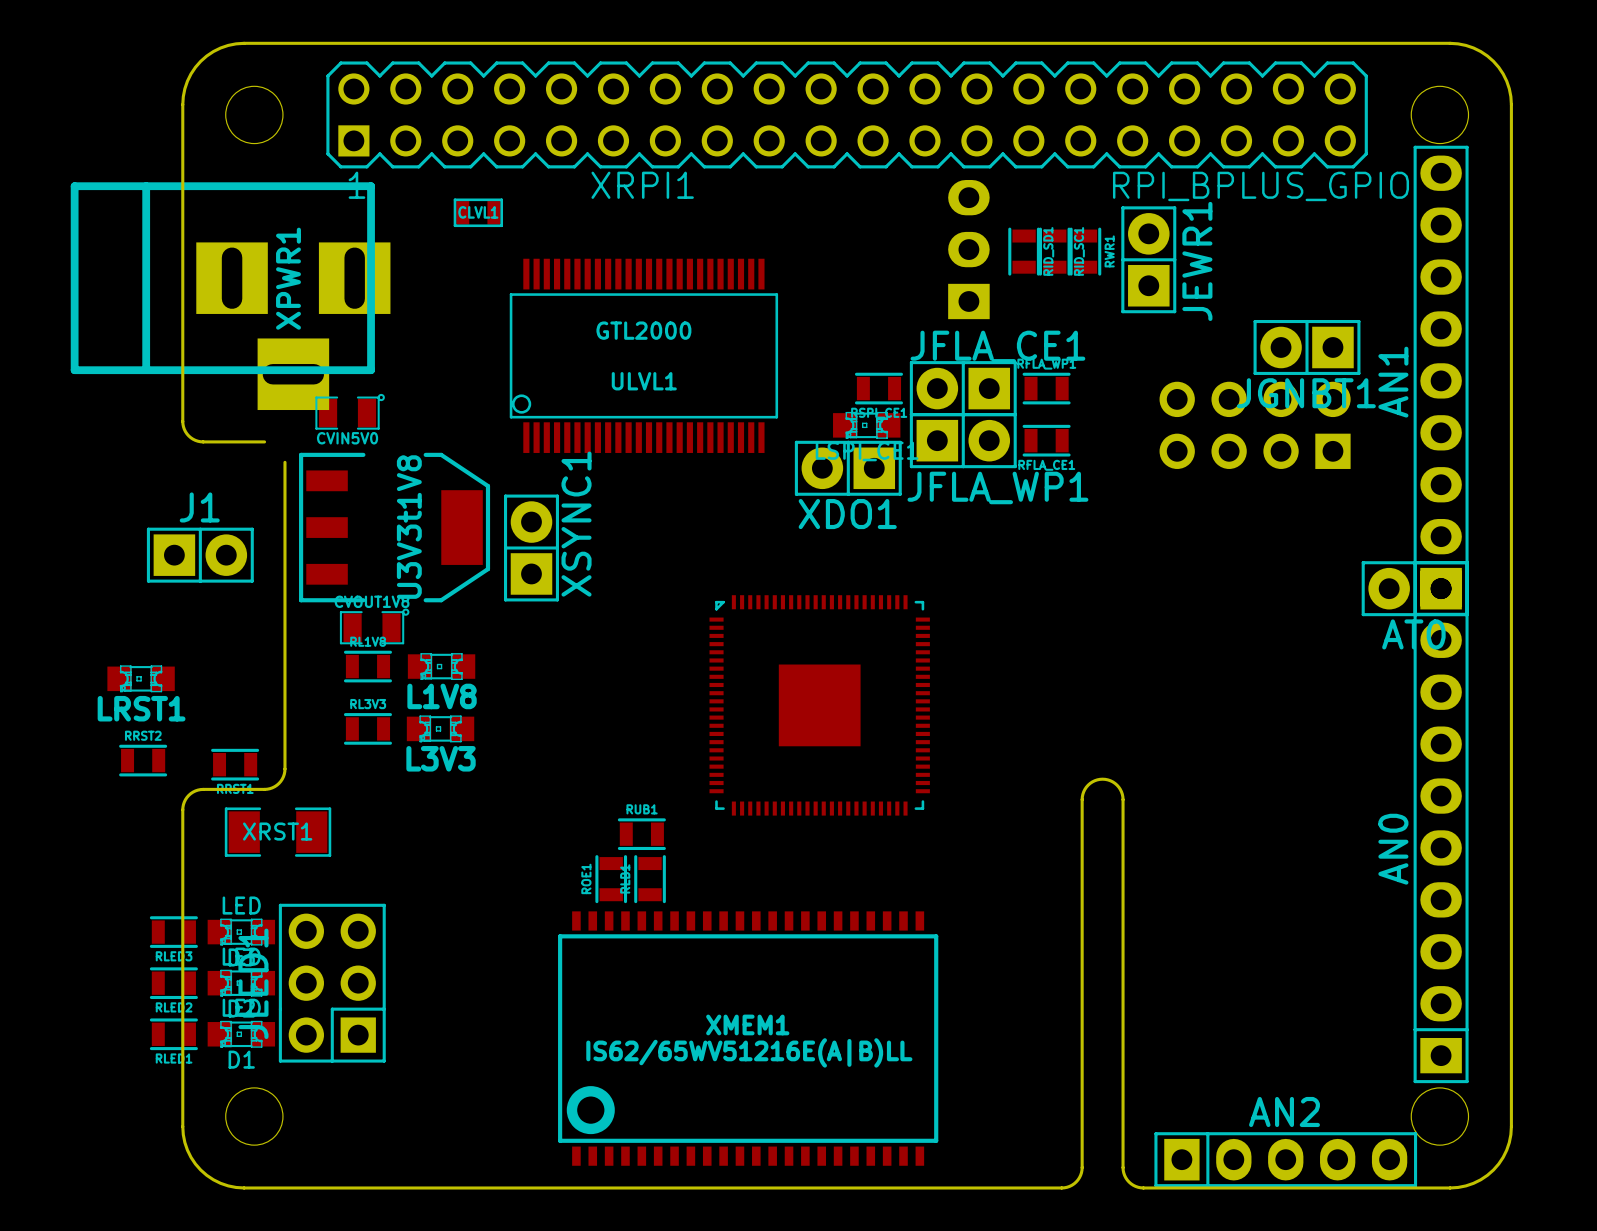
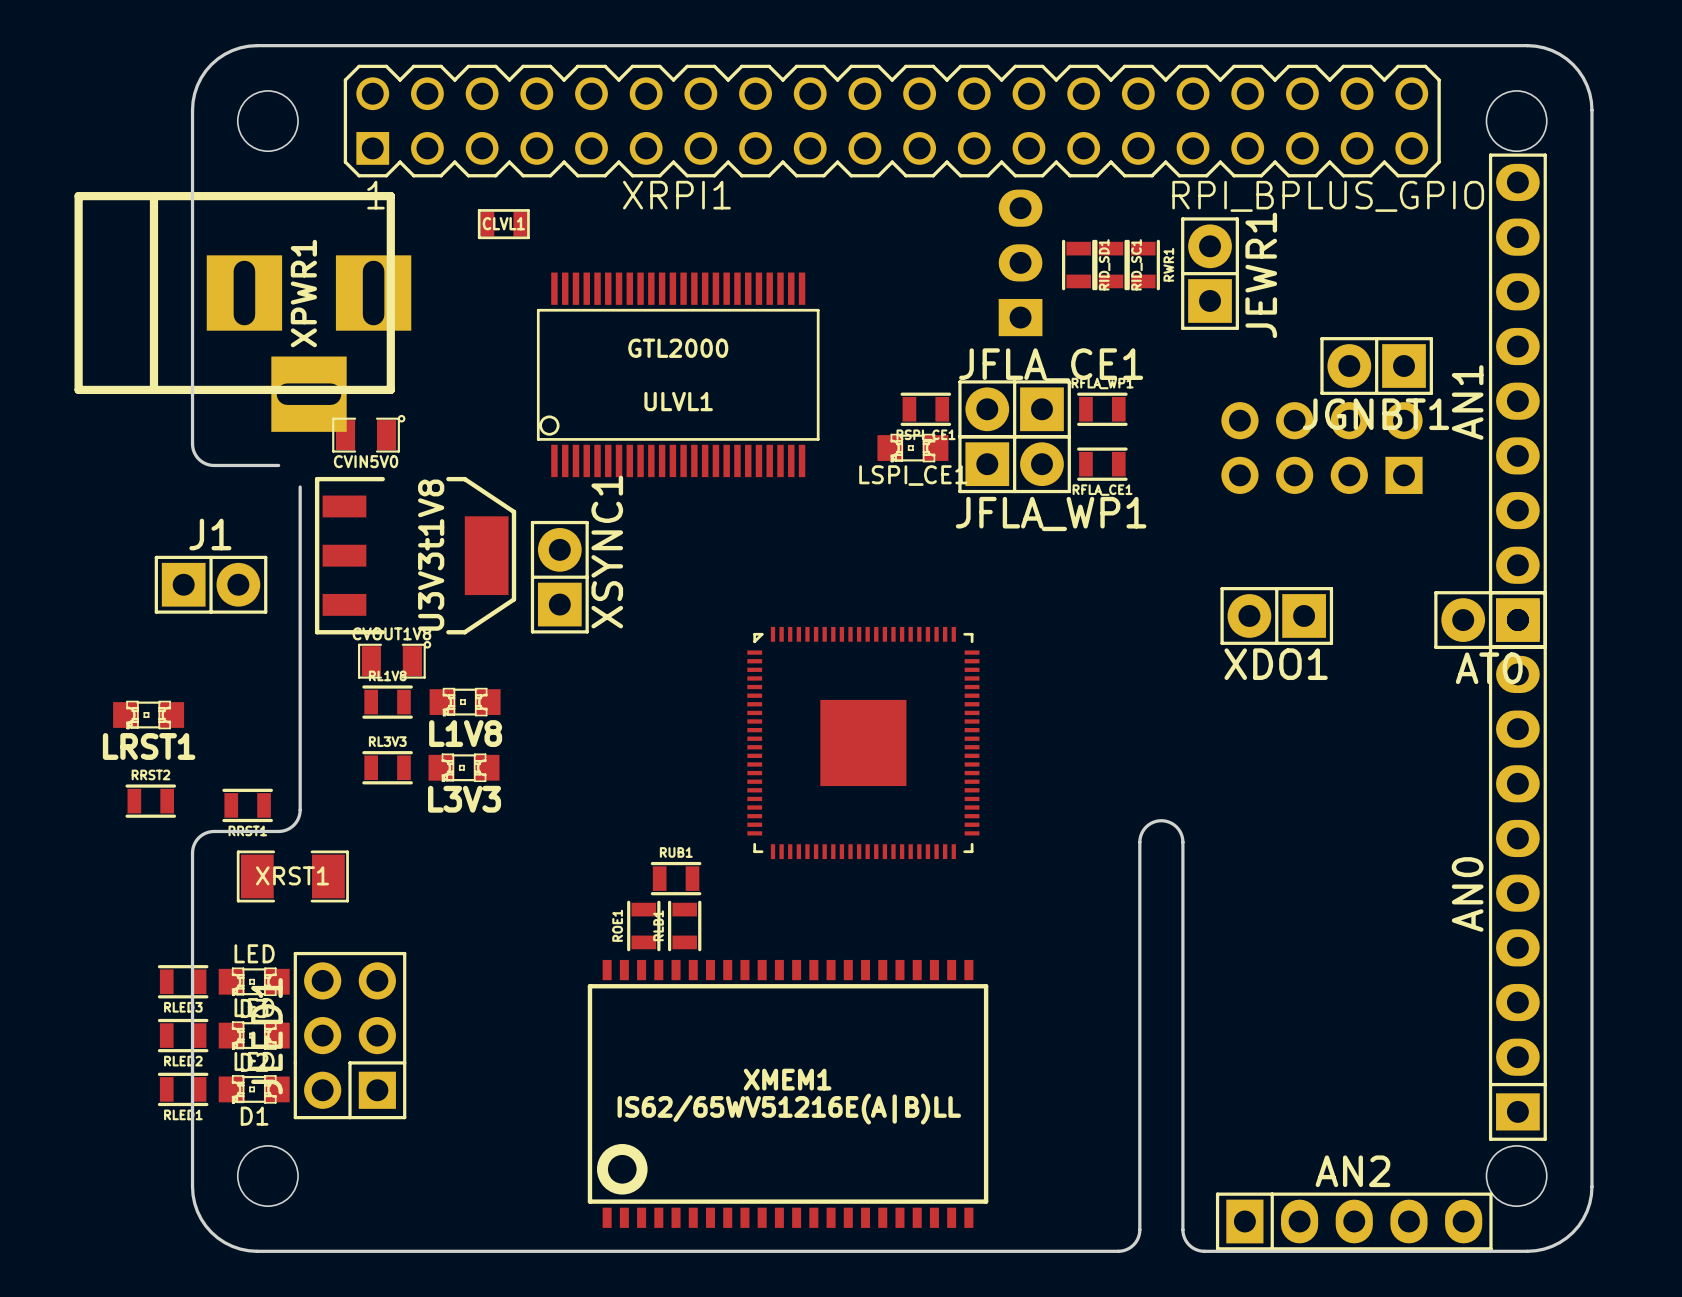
XDO1 position: (848, 468) -> (1276, 615)

